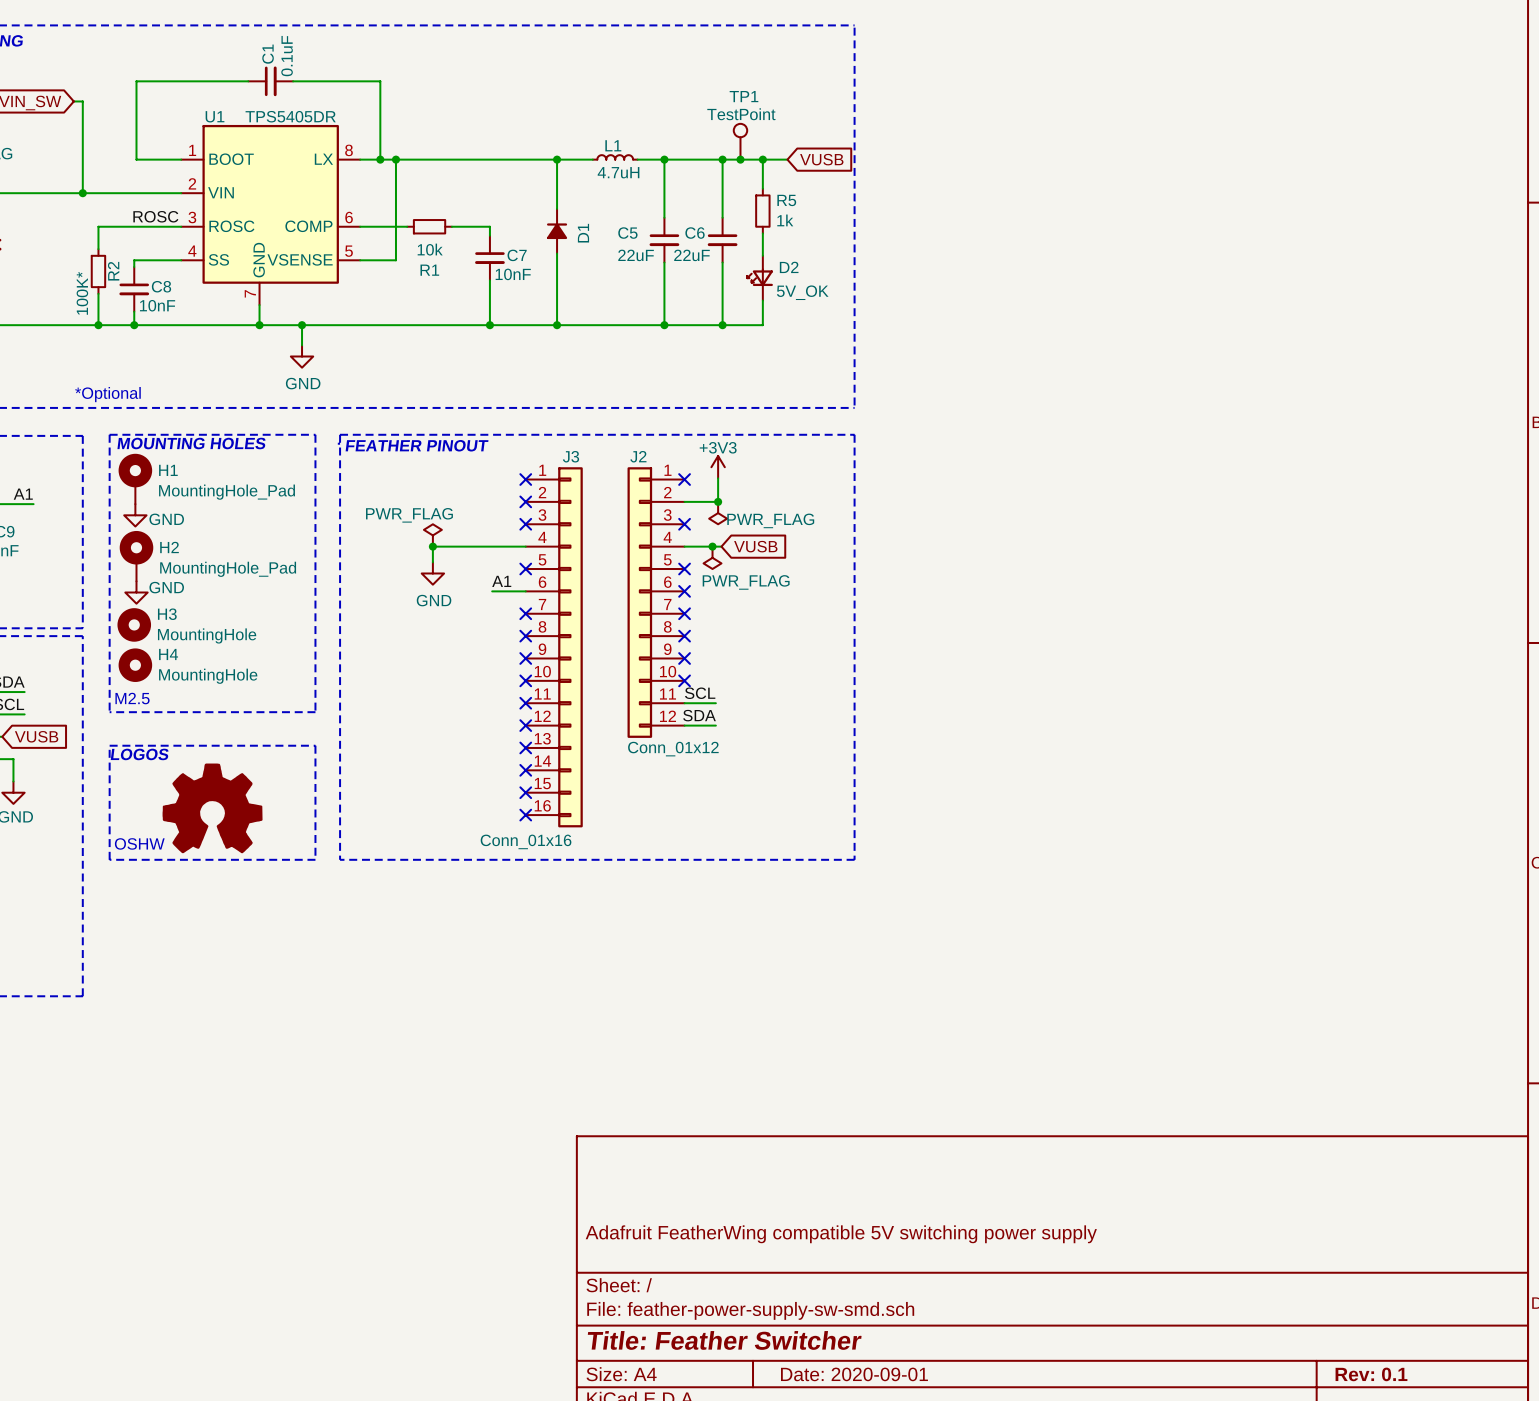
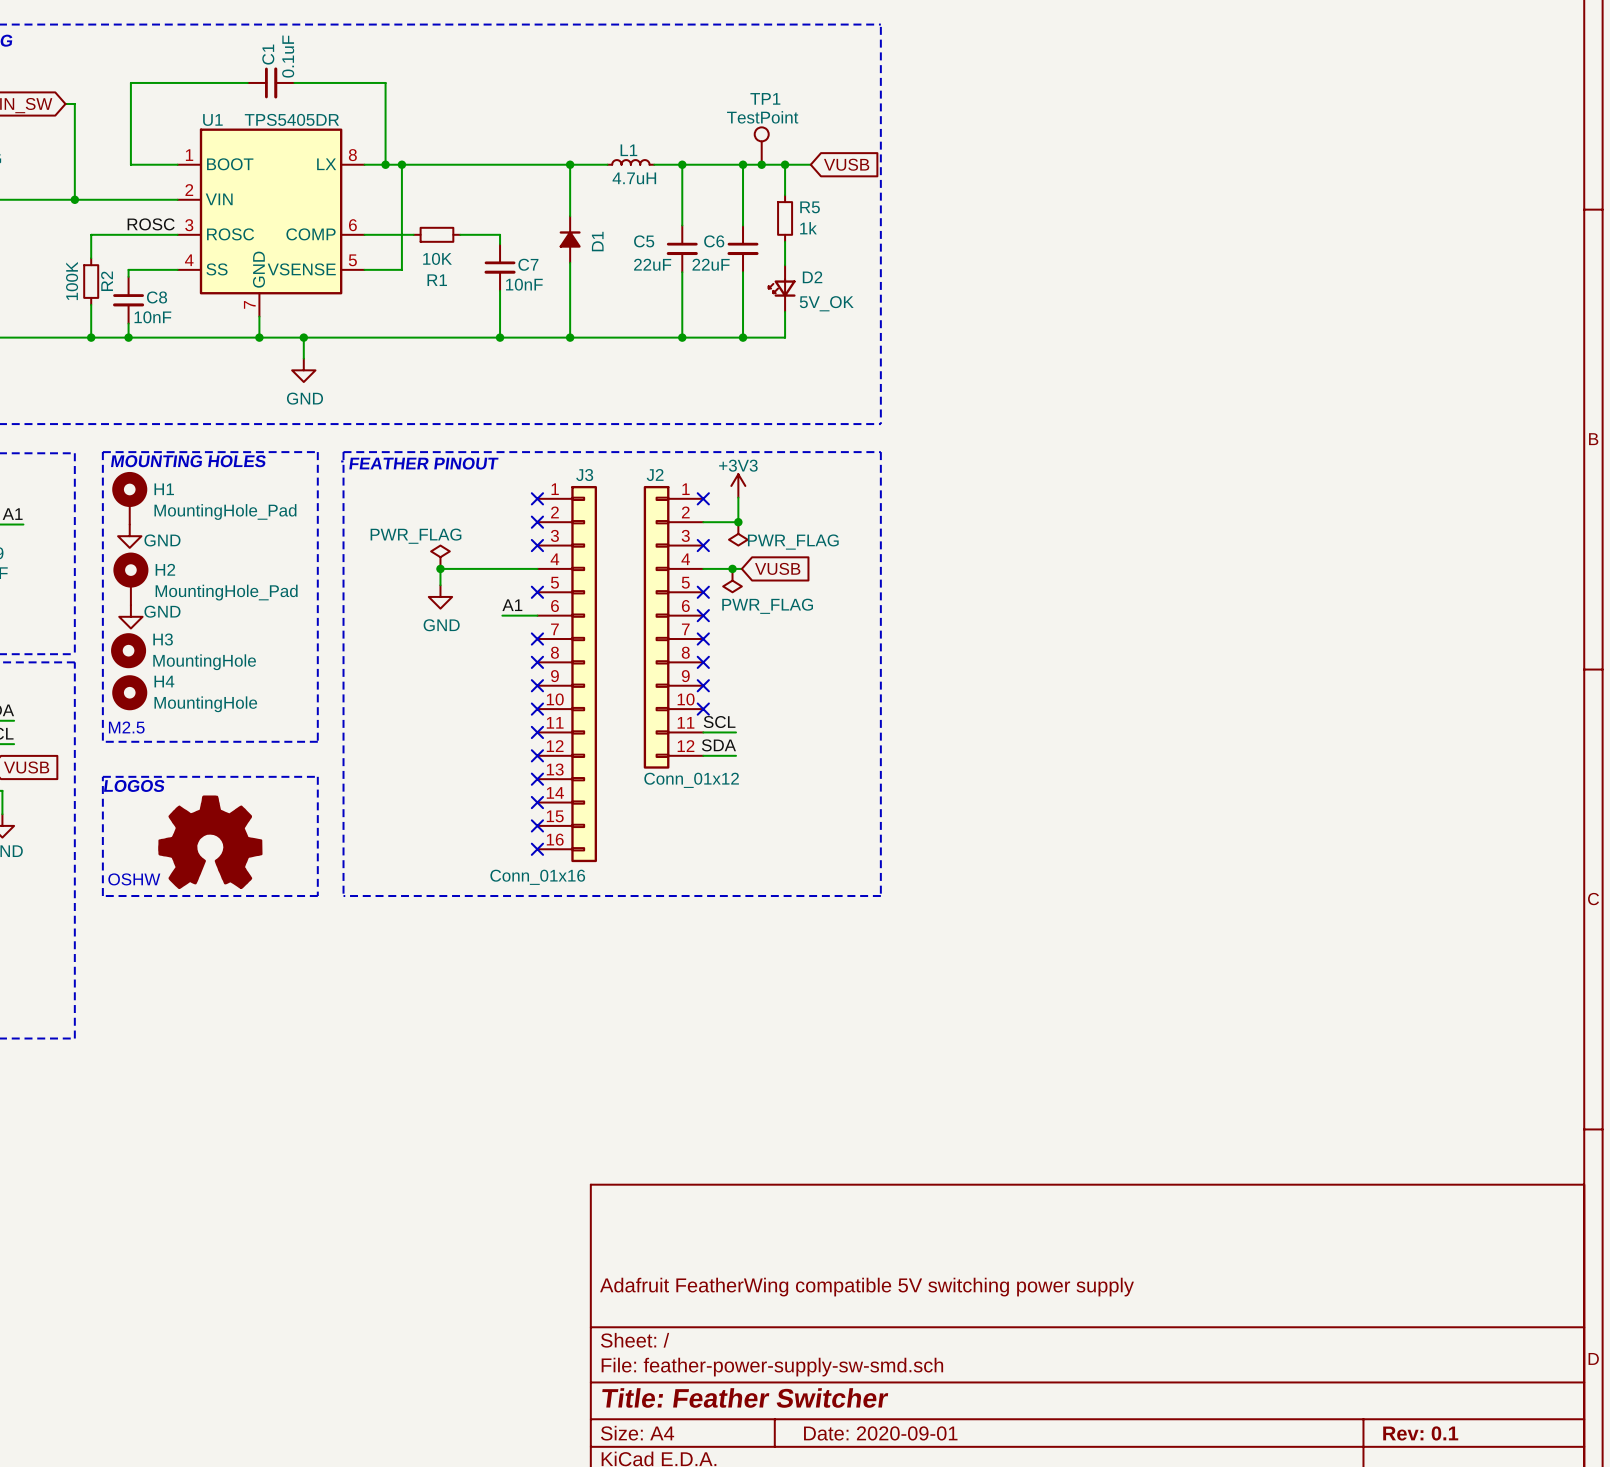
R1 value: 10k (430, 249) -> 10K (437, 258)
R2 value: 100K* (82, 293) -> 100K (72, 280)
text: *Optional (108, 394) -> none

